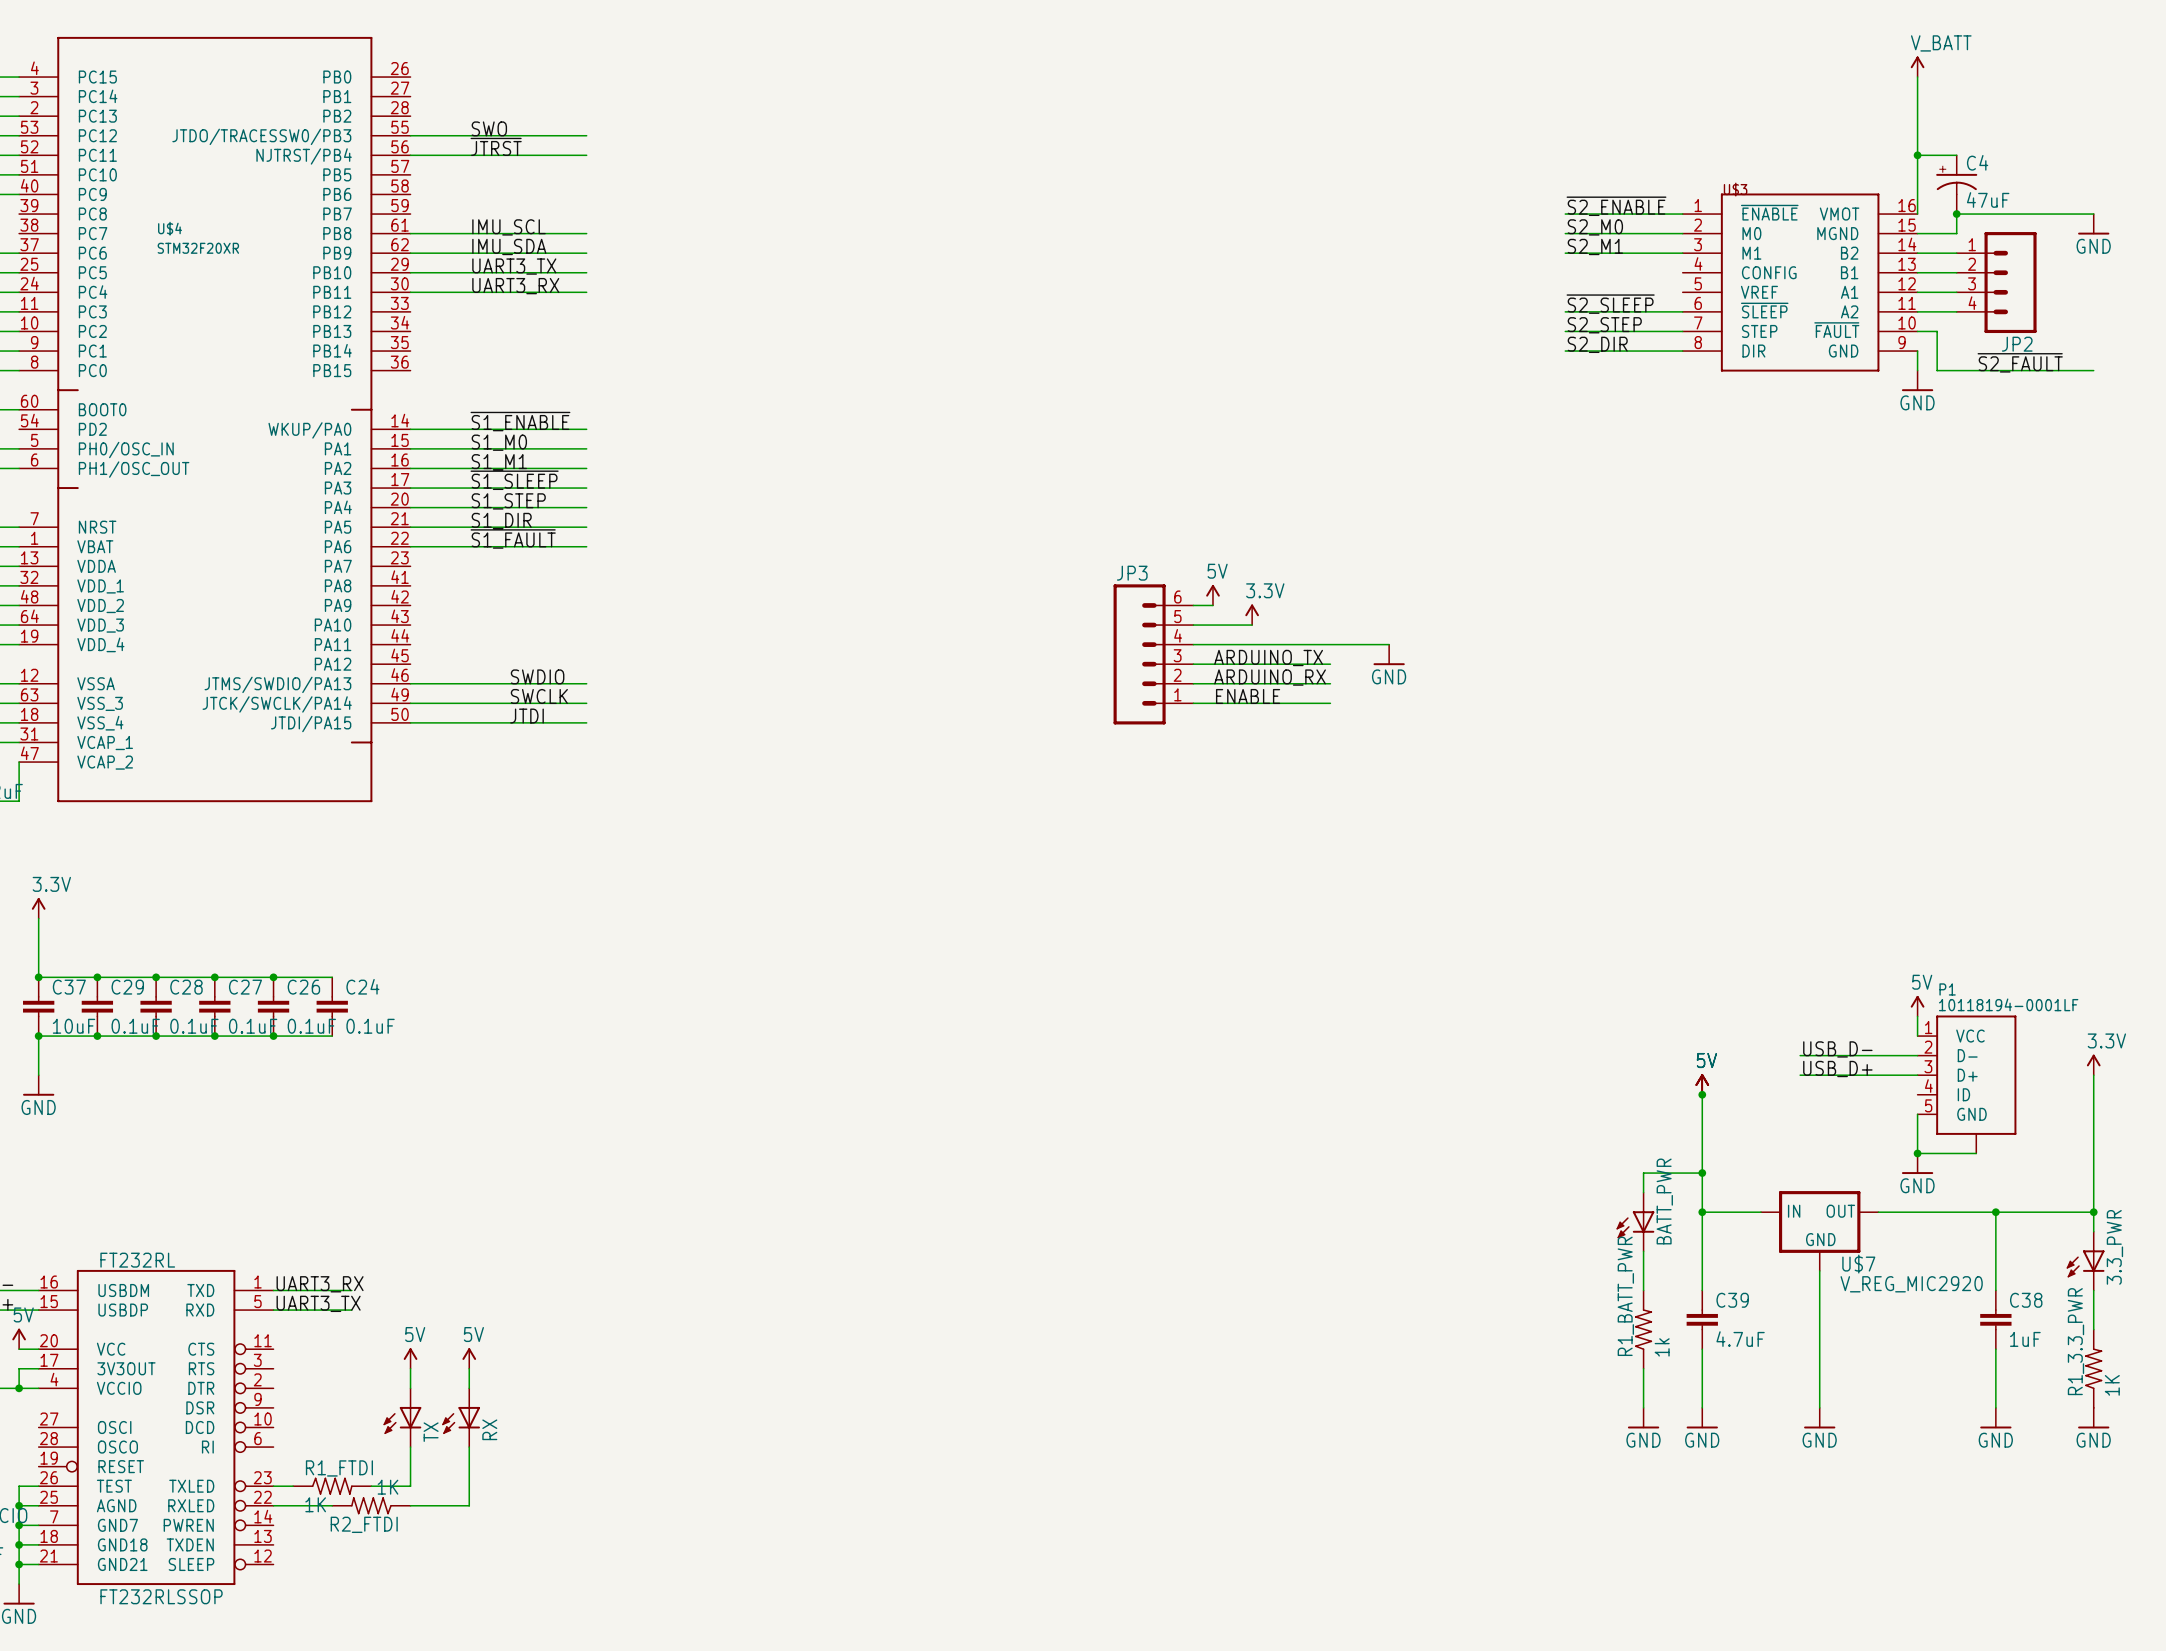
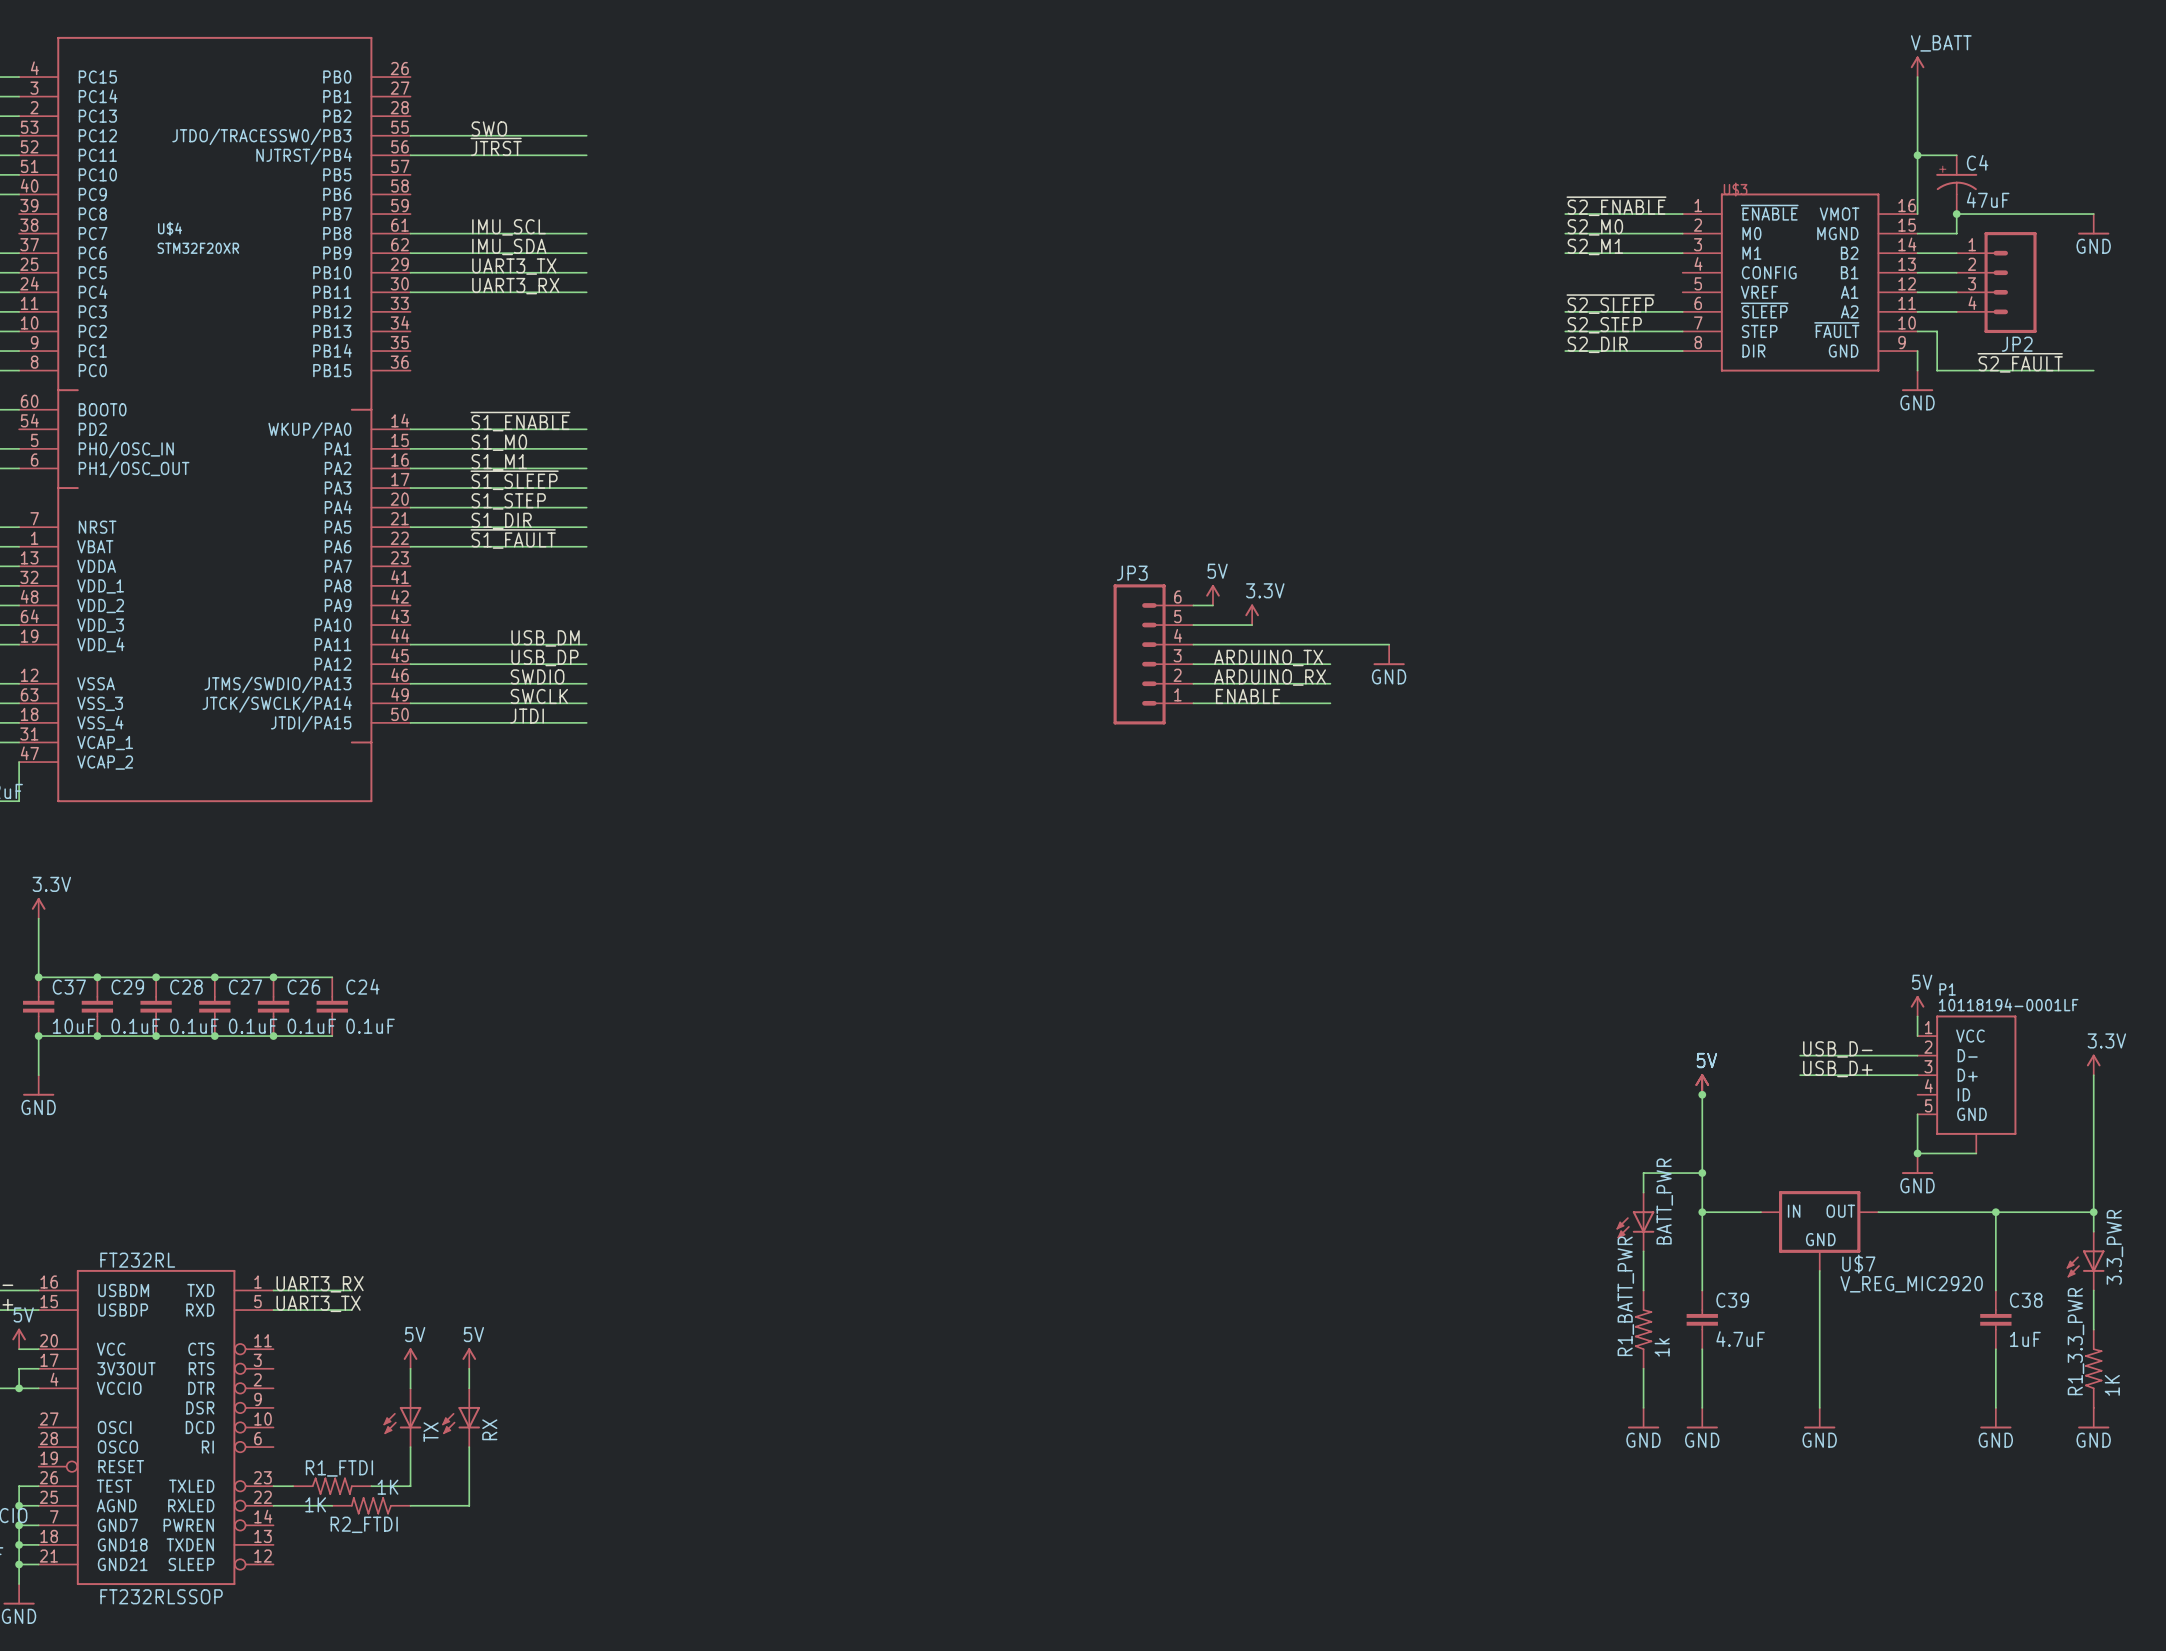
label: none -> USB_DM (545, 638)
wire: none -> (410, 644) (586, 644)
label: none -> USB_DP (544, 657)
wire: none -> (410, 664) (586, 664)

